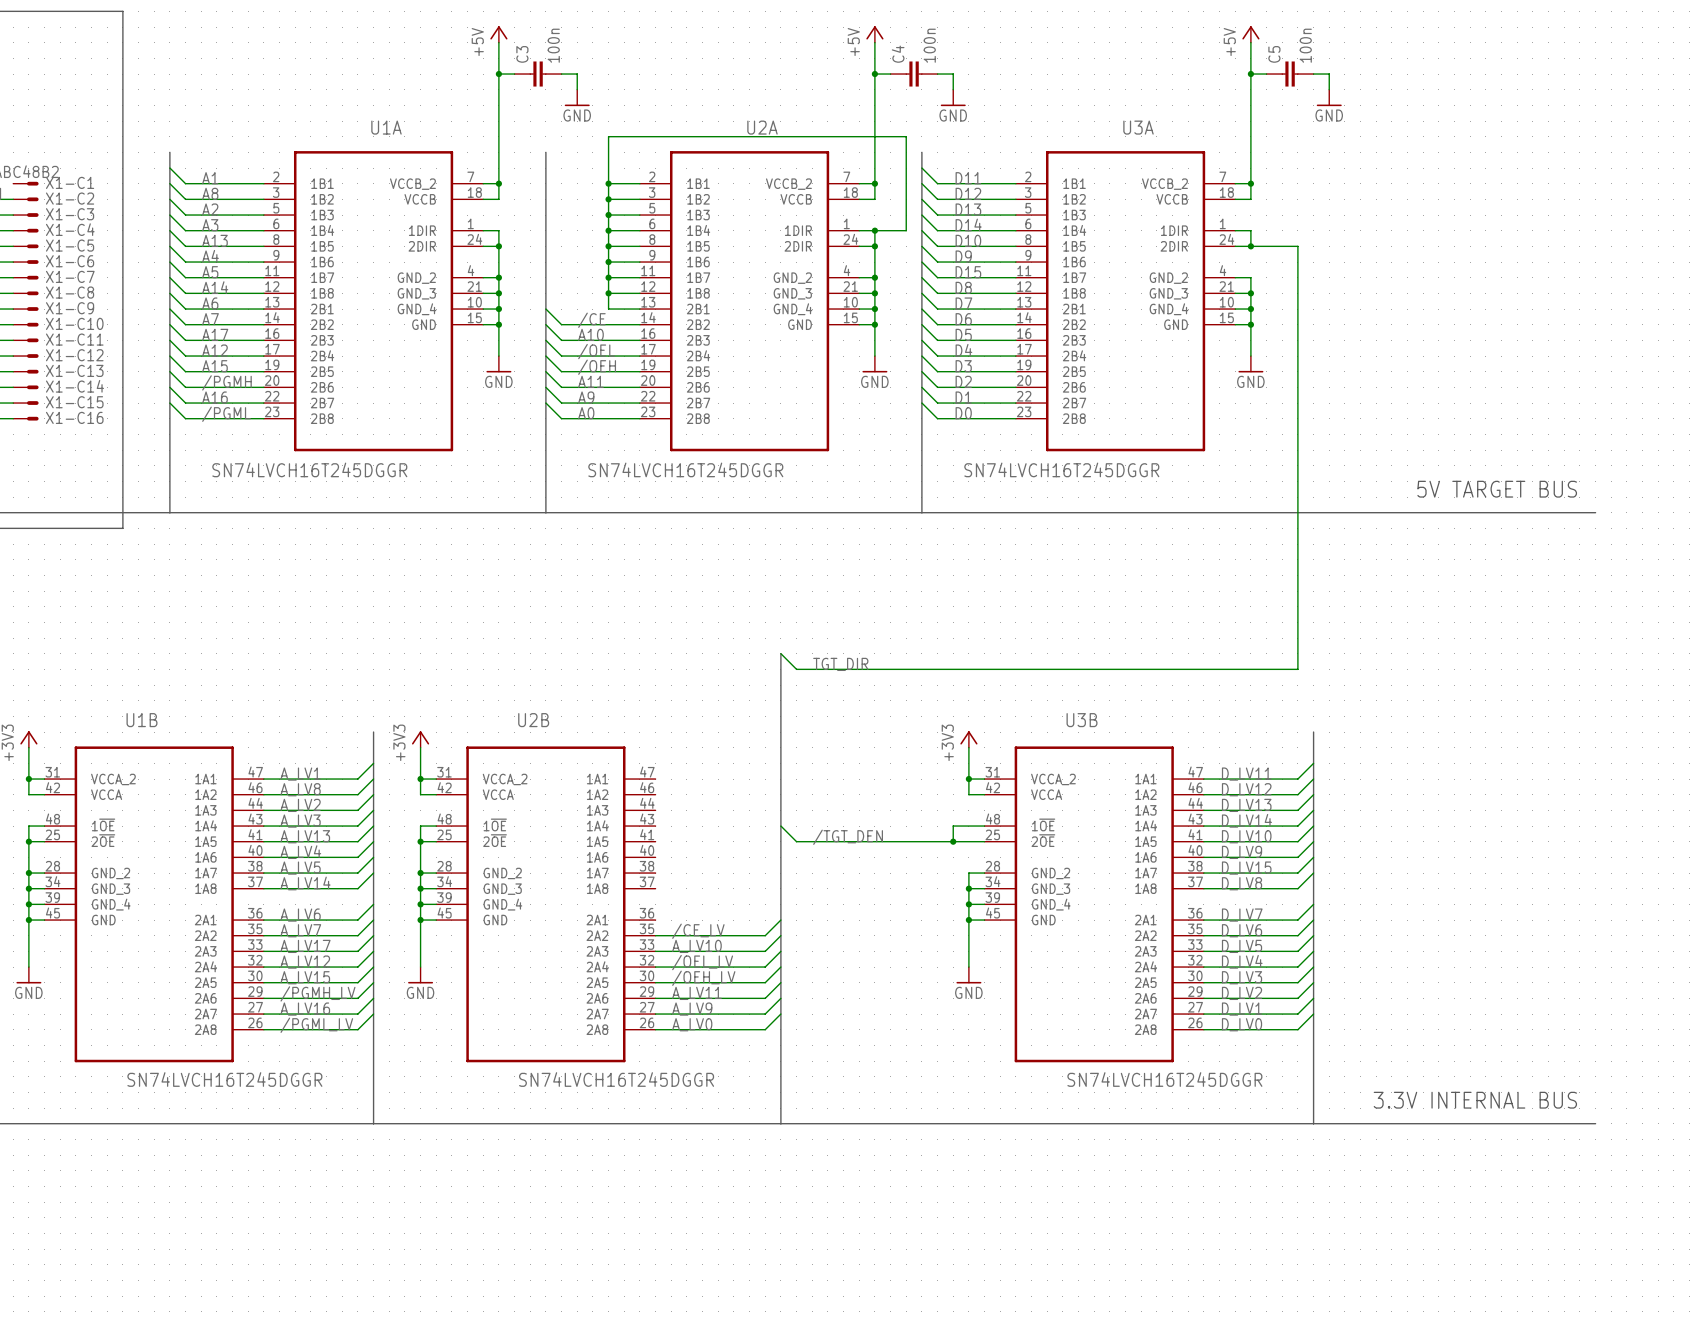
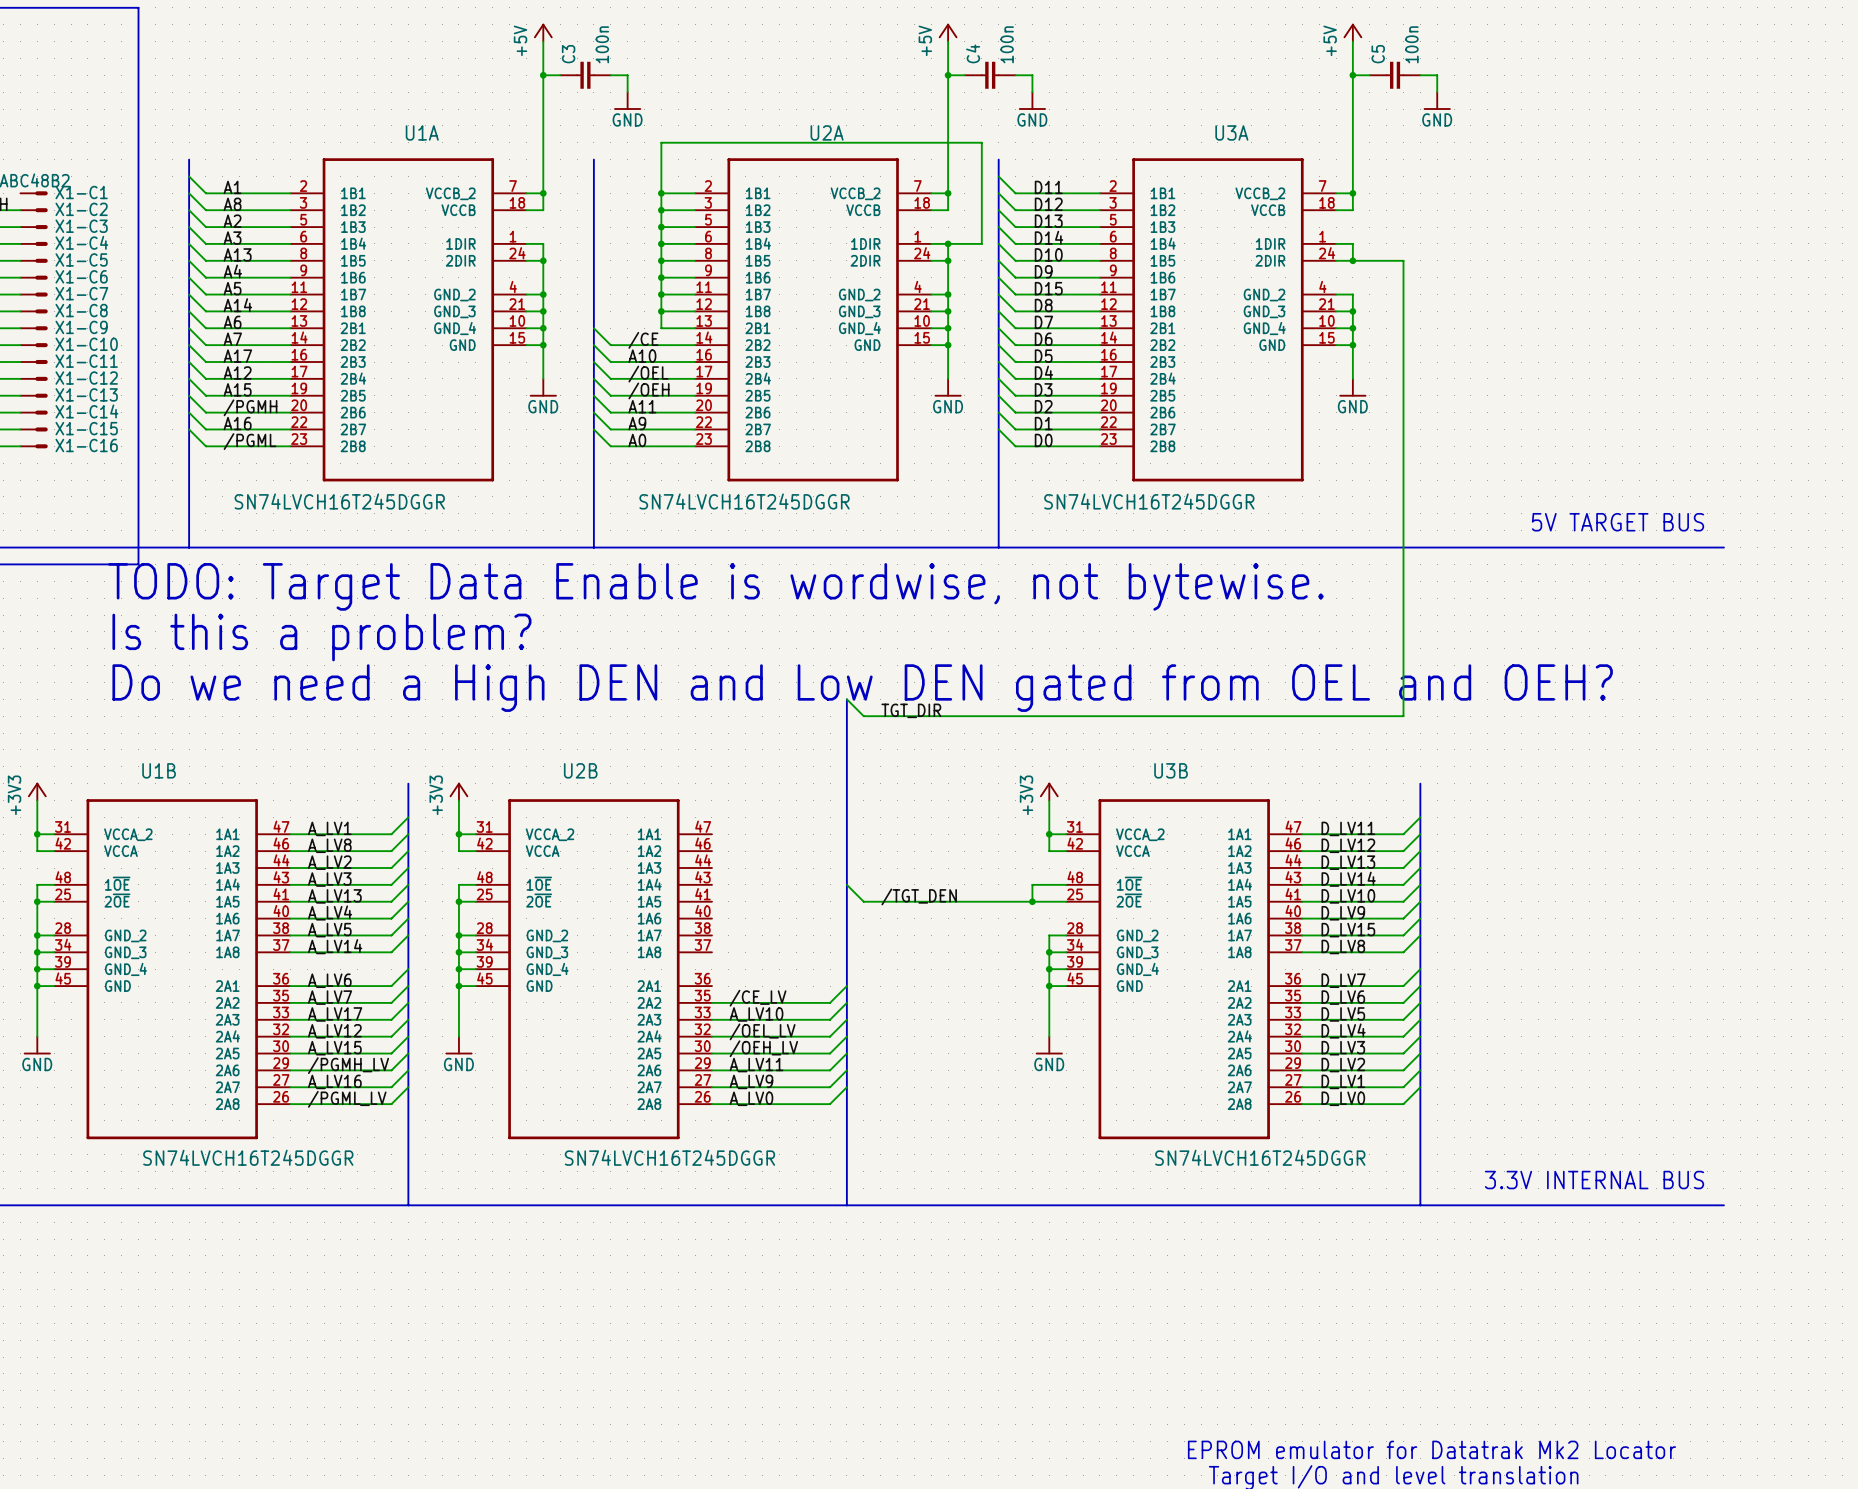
text: none -> TODO: Target Data Enable is wordwise, not bytewise. (715, 586)
text: none -> Is this a problem? (321, 637)
text: none -> Do we need a High DEN and Low DEN gated from OEL and OEH? (862, 688)

